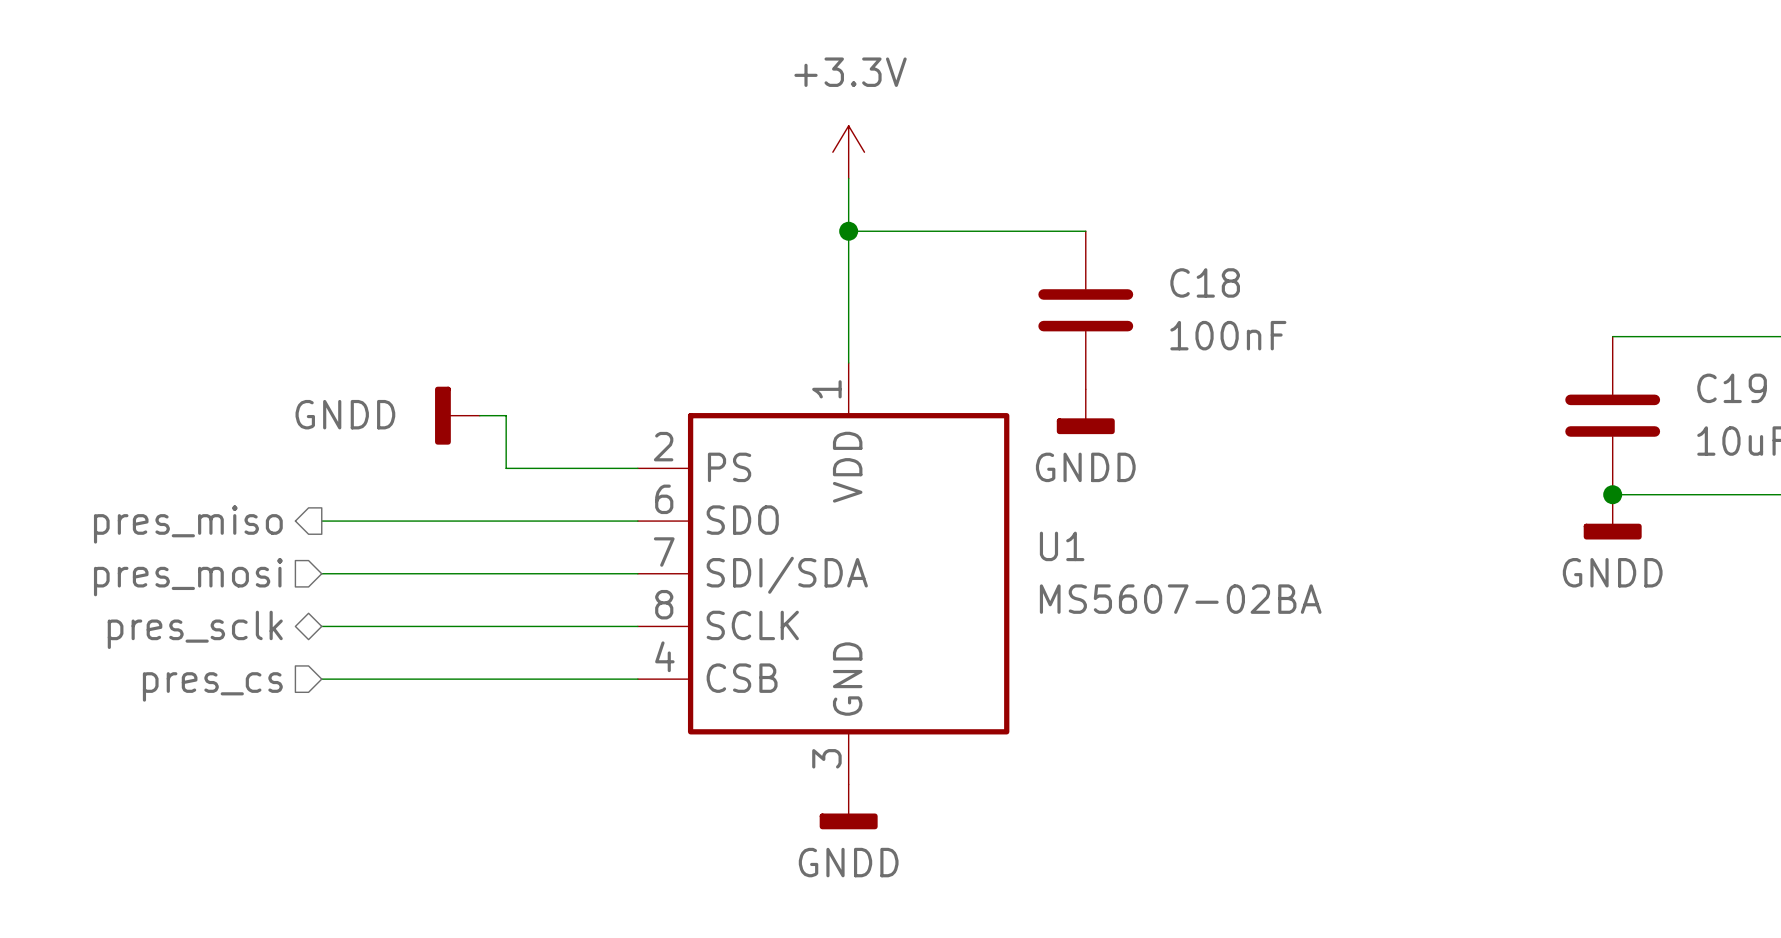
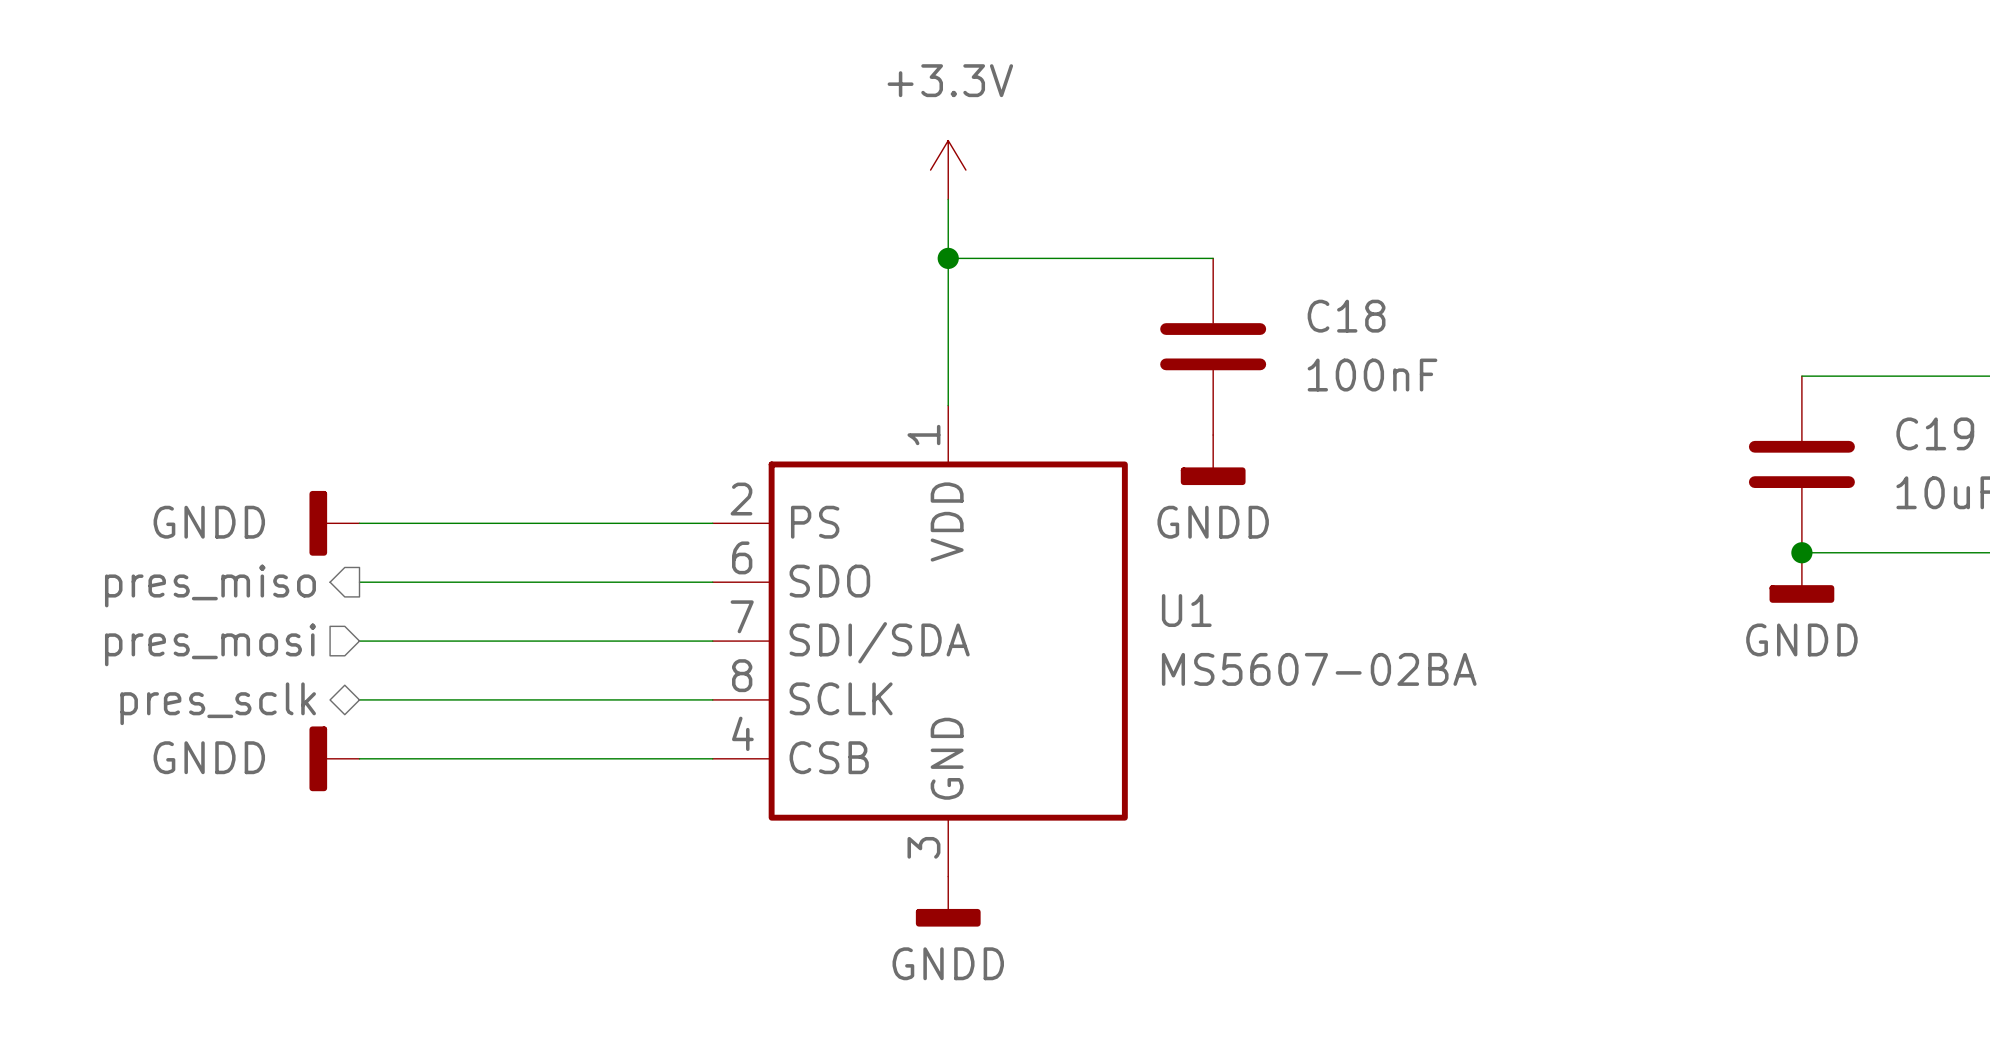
power symbol: GNDD (457, 415) -> none
wire: (479, 415) (506, 415) (506, 468) -> (359, 523) (565, 523)
power symbol: none -> GNDD (334, 523)
power symbol: none -> GNDD (334, 758)
hierarchical label: pres_cs (212, 686) -> none

